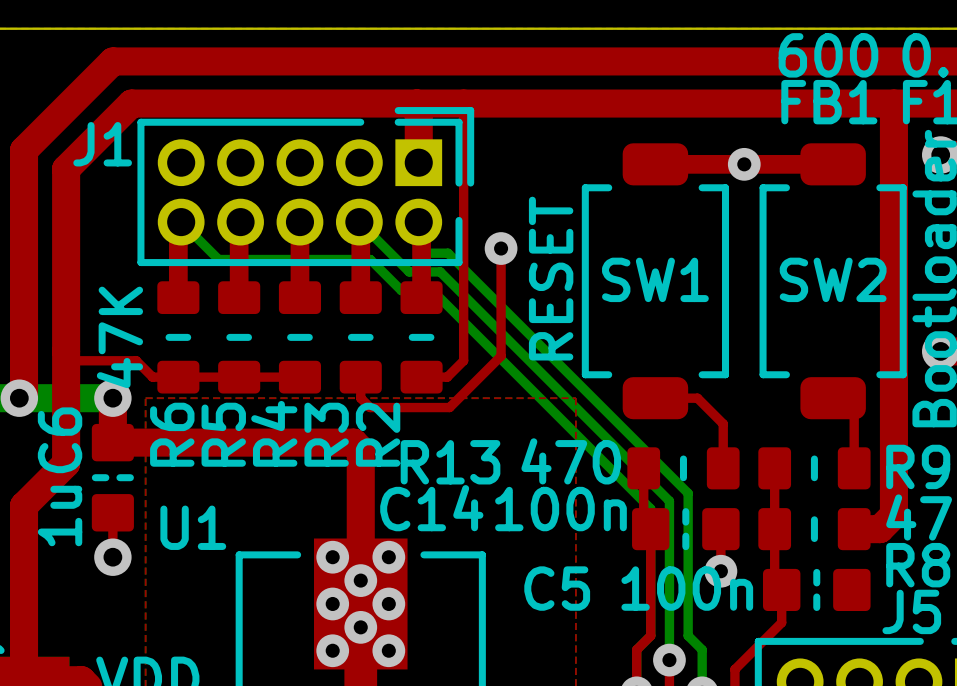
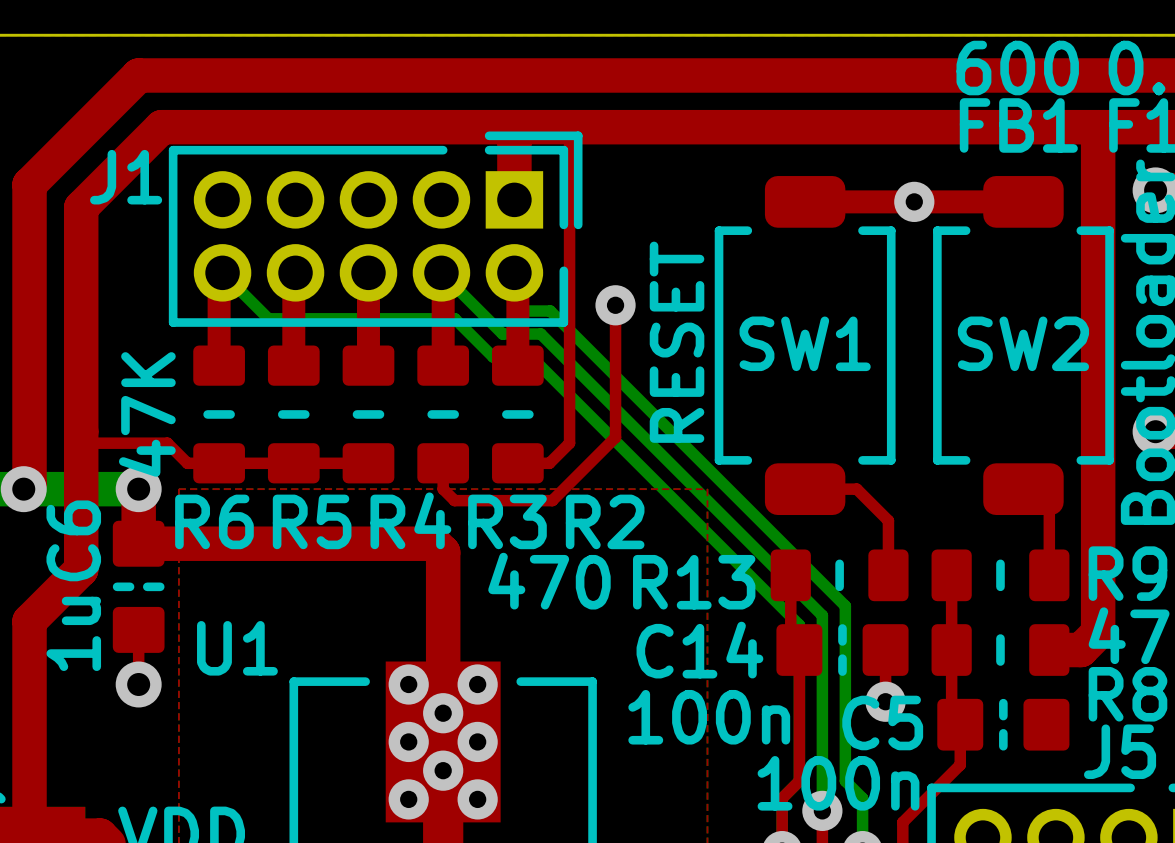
R4 name rotation: 0° (274, 433) -> 90° clockwise (410, 520)
R6 name rotation: 0° (172, 434) -> 90° clockwise (214, 521)
R5 name rotation: 0° (223, 434) -> 90° clockwise (312, 521)
R3 name rotation: 0° (326, 434) -> 90° clockwise (507, 521)
R2 name rotation: 0° (378, 434) -> 90° clockwise (605, 521)
R2 name position: R2 (378, 434) -> R2 (605, 521)
R13 value position: 470 (571, 461) -> 470 (549, 581)
R13 name position: R13 (450, 462) -> R13 (694, 582)
C14 name position: C14 (431, 508) -> C14 (699, 650)
C14 value position: 100n (560, 509) -> 100n (709, 717)
C5 name position: C5 (557, 588) -> C5 (882, 722)
C5 value position: 100n (687, 588) -> 100n (838, 783)

